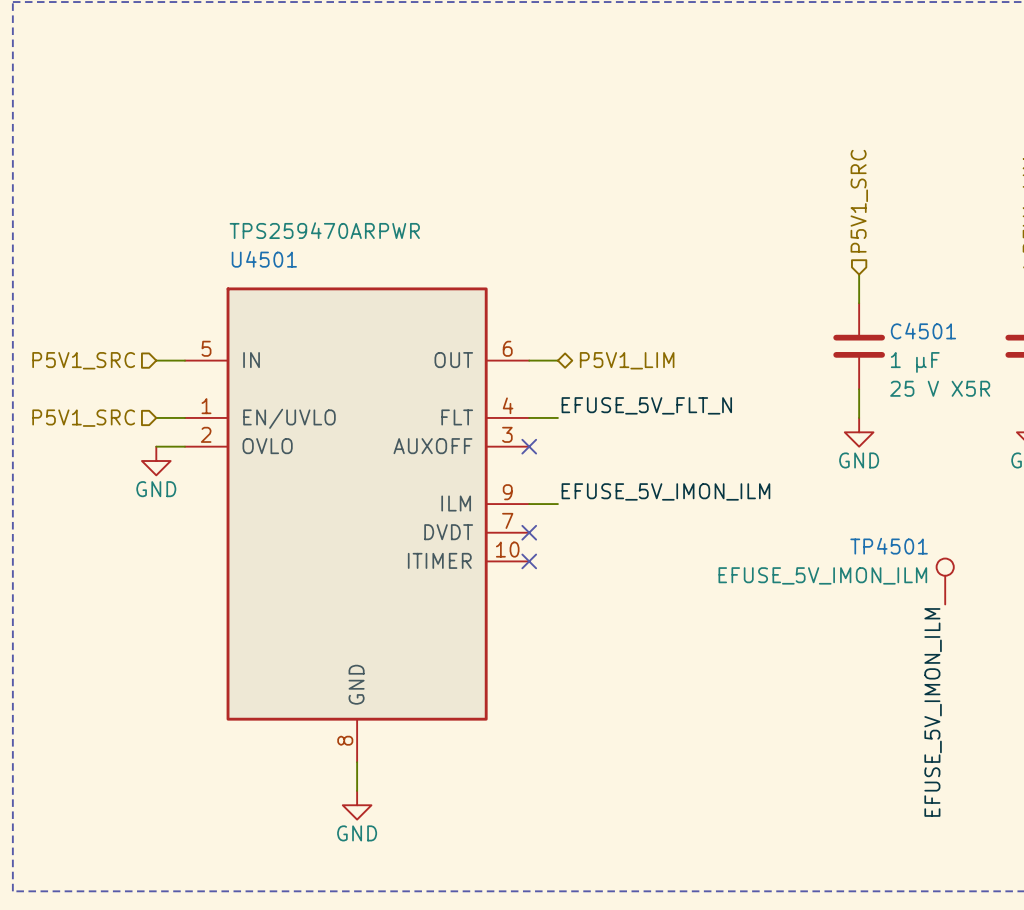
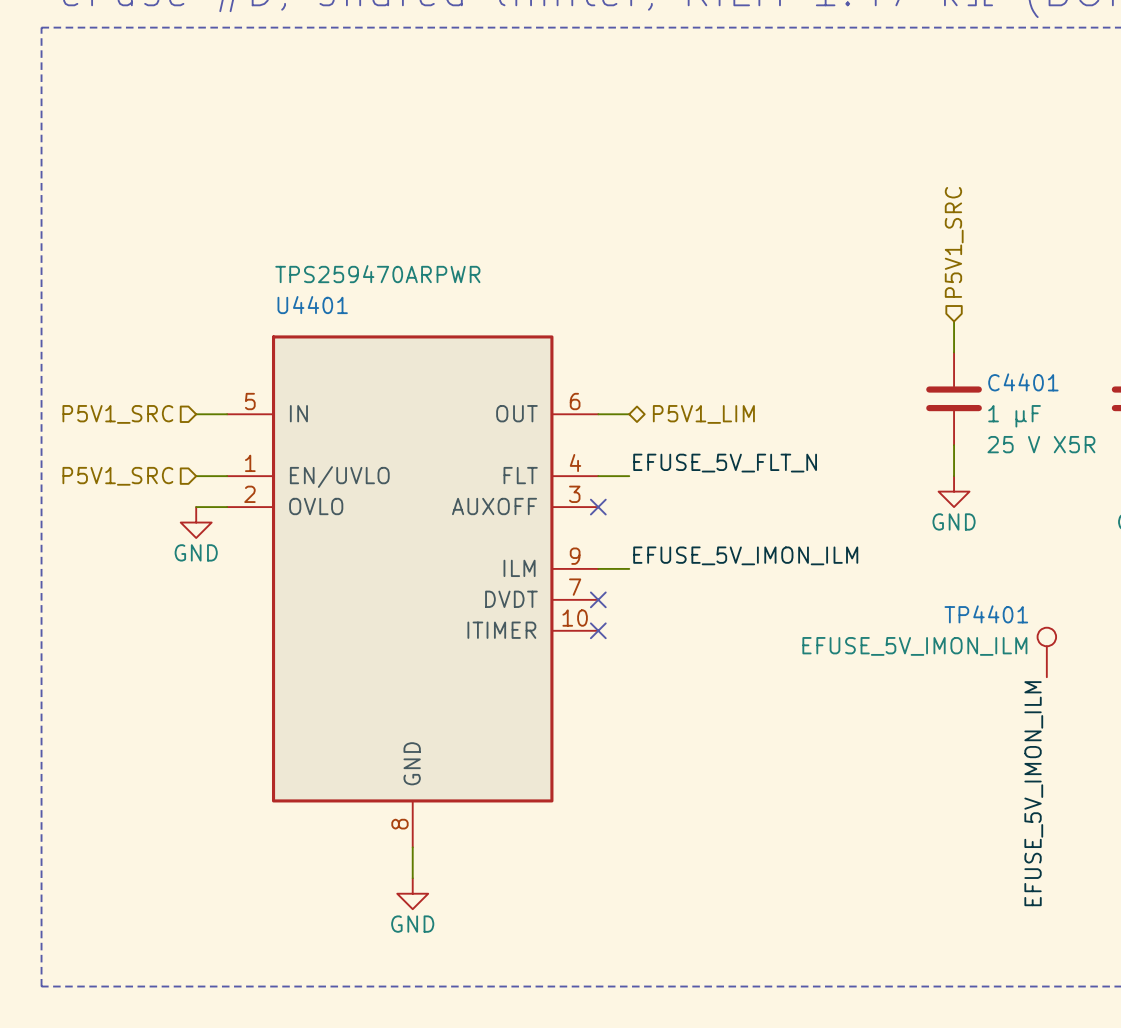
U4501 name: U4501 (264, 259) -> U4401 (312, 305)
C4501 name: C4501 (923, 331) -> C4401 (1023, 382)
TP4501 name: TP4501 (889, 546) -> TP4401 (986, 614)

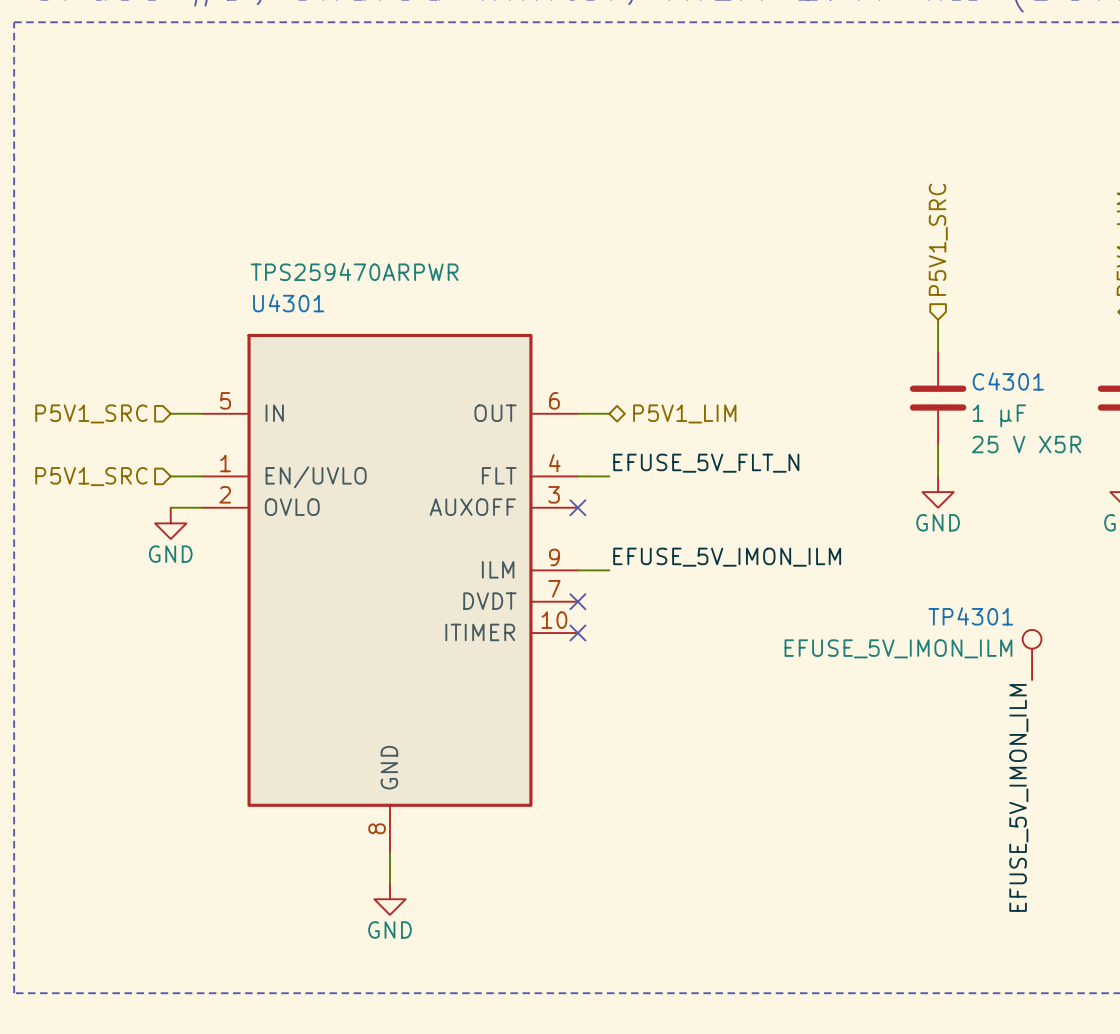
U4401 name: U4401 (312, 305) -> U4301 (288, 303)
C4401 name: C4401 (1023, 382) -> C4301 (1008, 381)
TP4401 name: TP4401 (986, 614) -> TP4301 (970, 616)

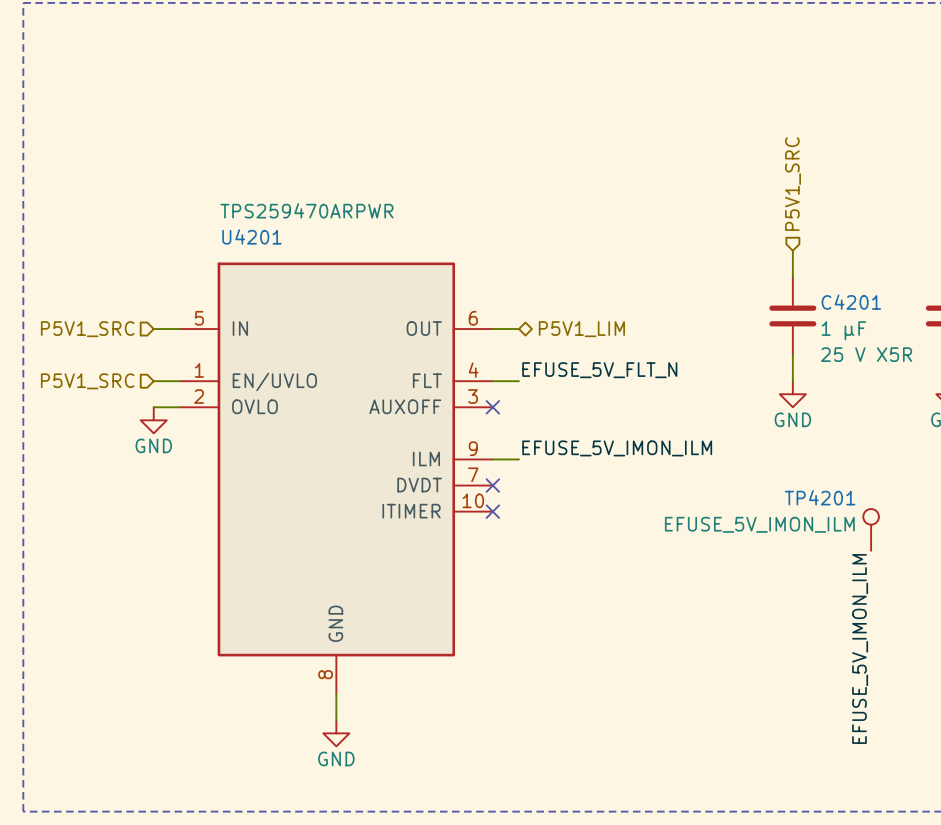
U4301 name: U4301 (288, 303) -> U4201 (251, 236)
C4301 name: C4301 (1008, 381) -> C4201 (851, 302)
TP4301 name: TP4301 (970, 616) -> TP4201 (820, 497)

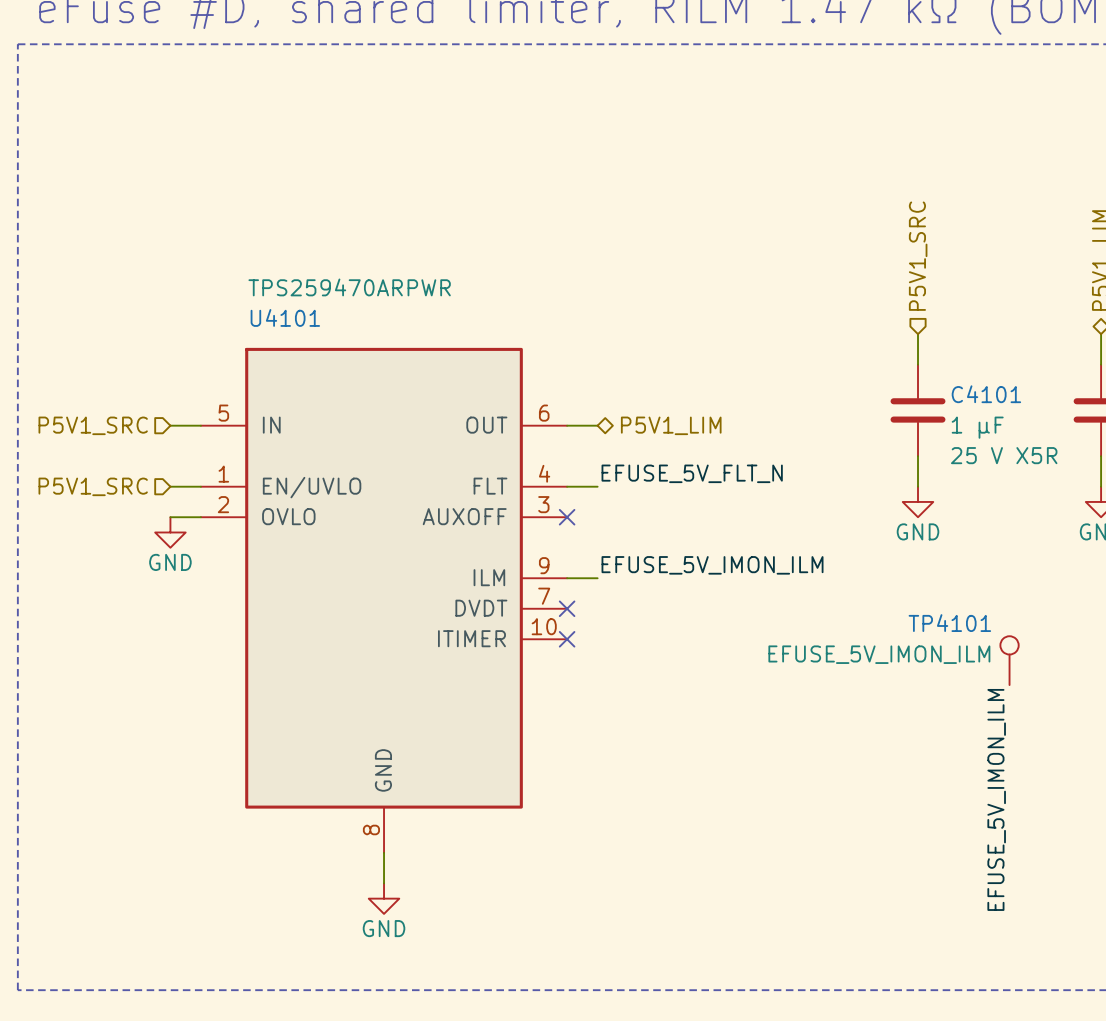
U4201 name: U4201 (251, 236) -> U4101 (285, 317)
C4201 name: C4201 (851, 302) -> C4101 (986, 394)
TP4201 name: TP4201 (820, 497) -> TP4101 (949, 623)

